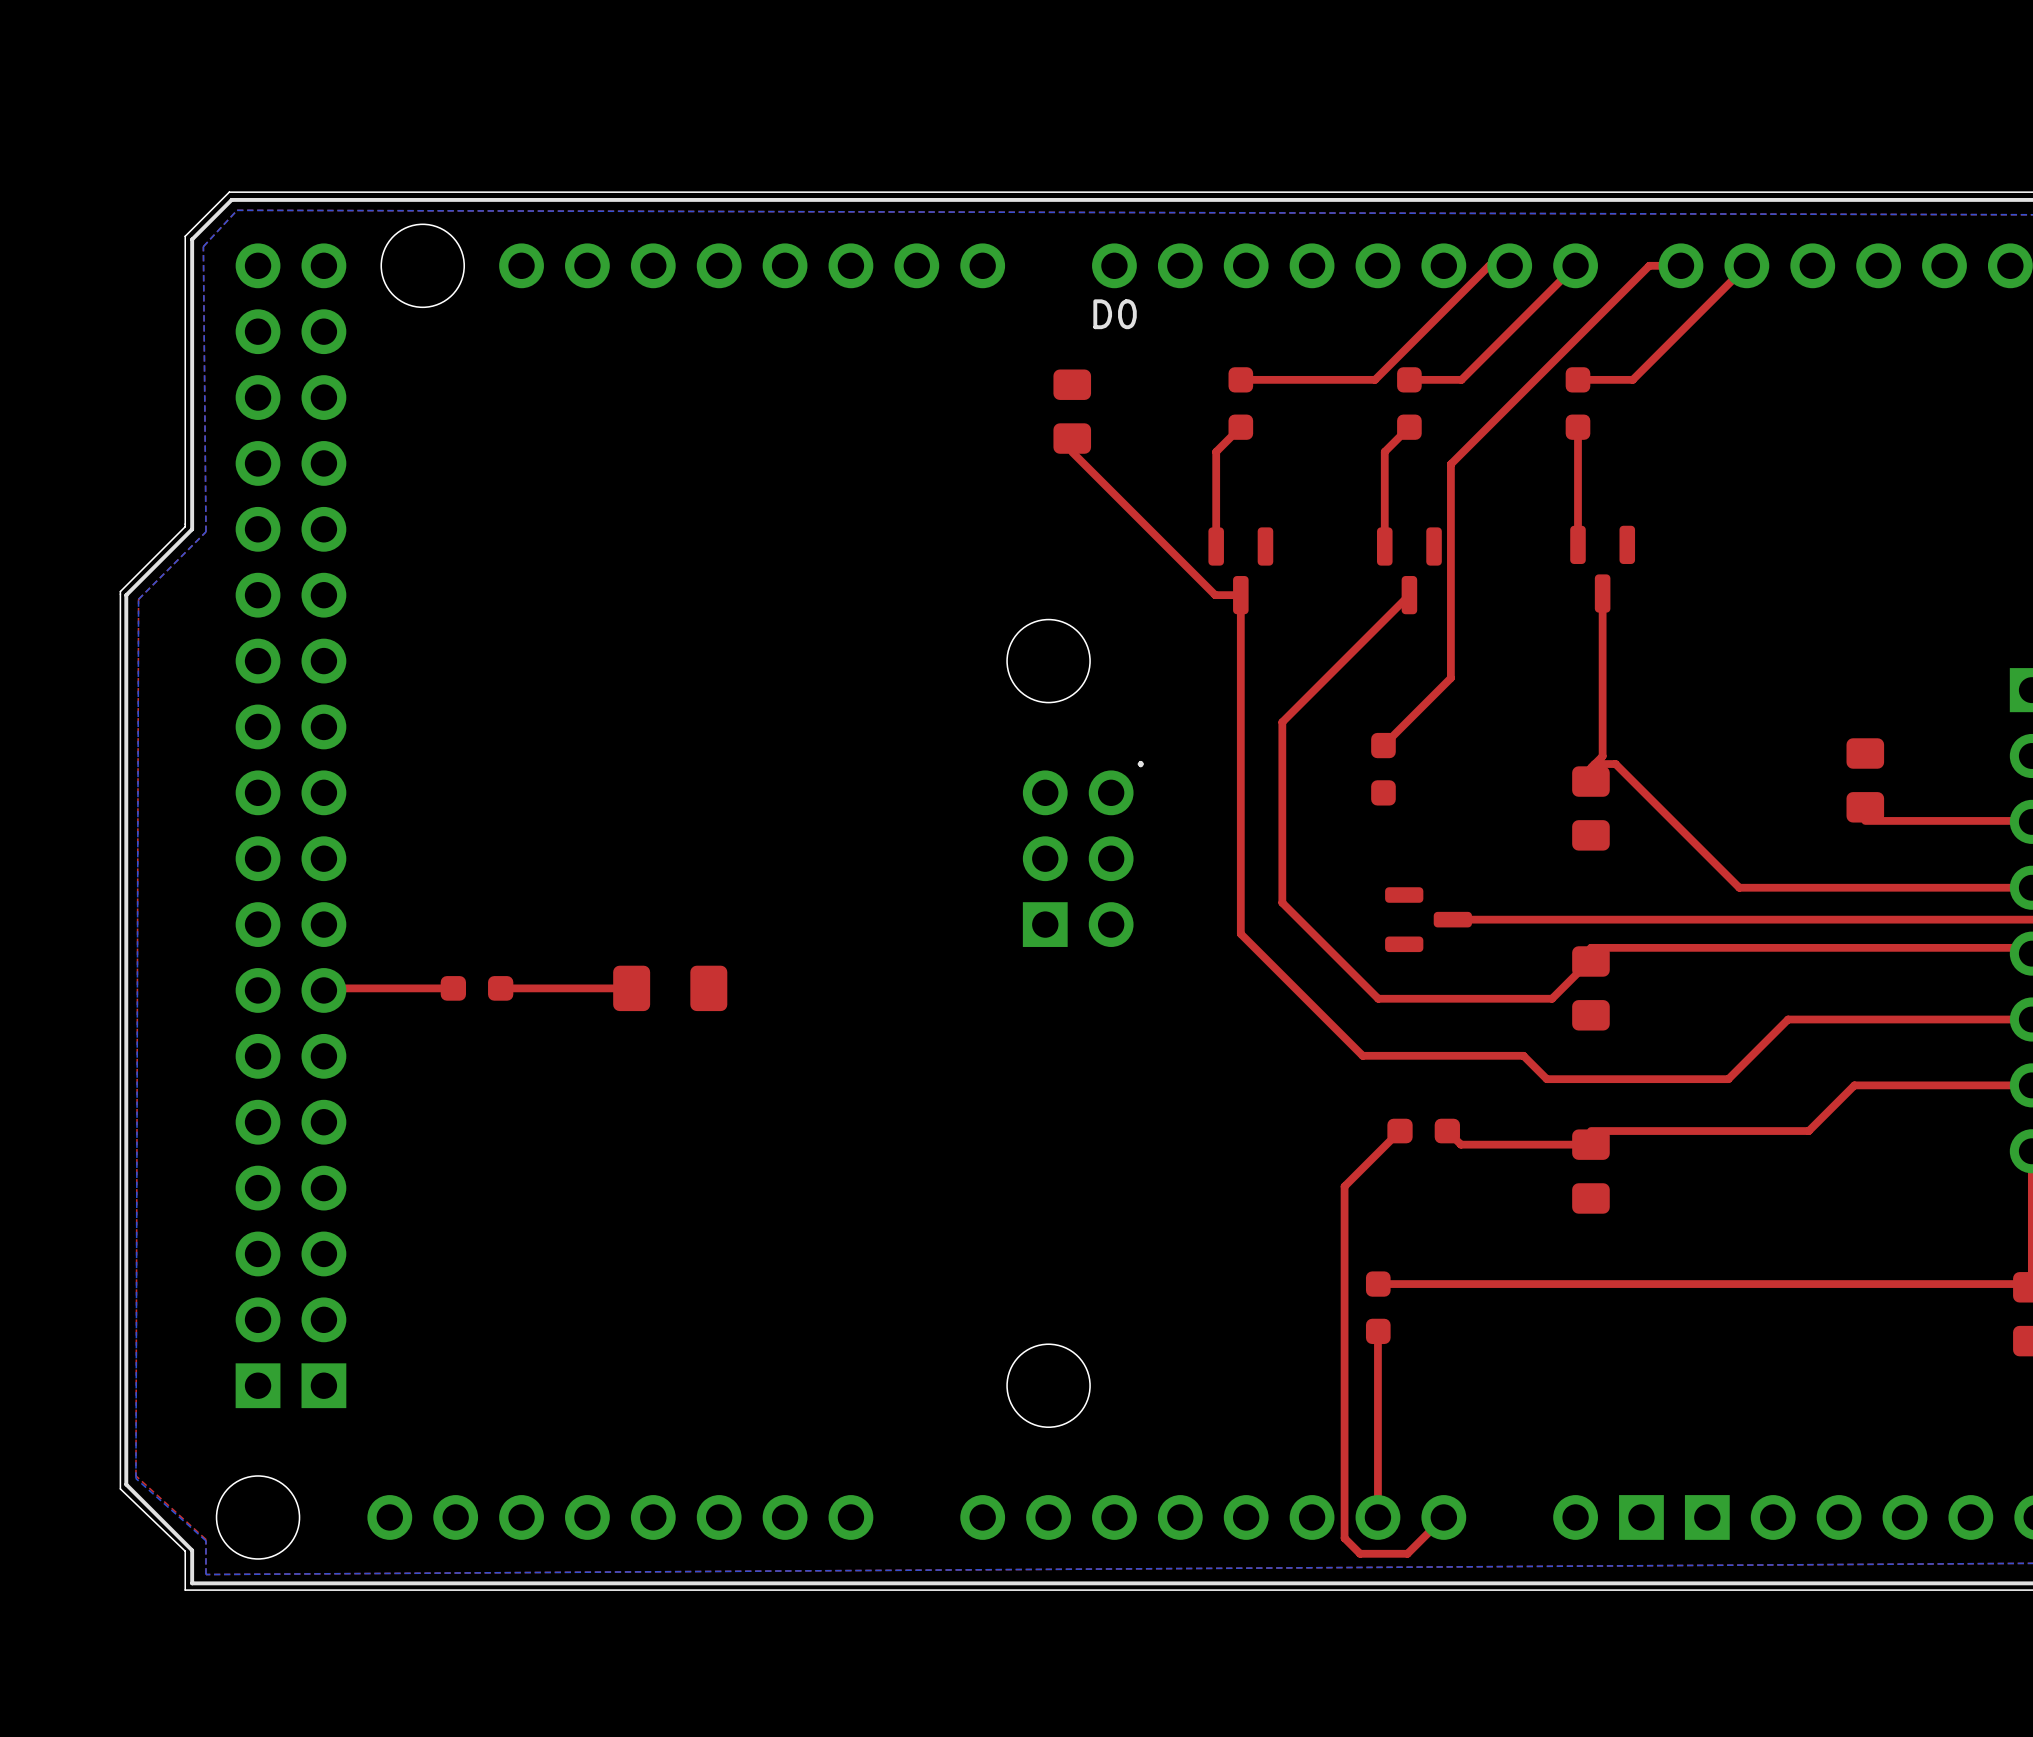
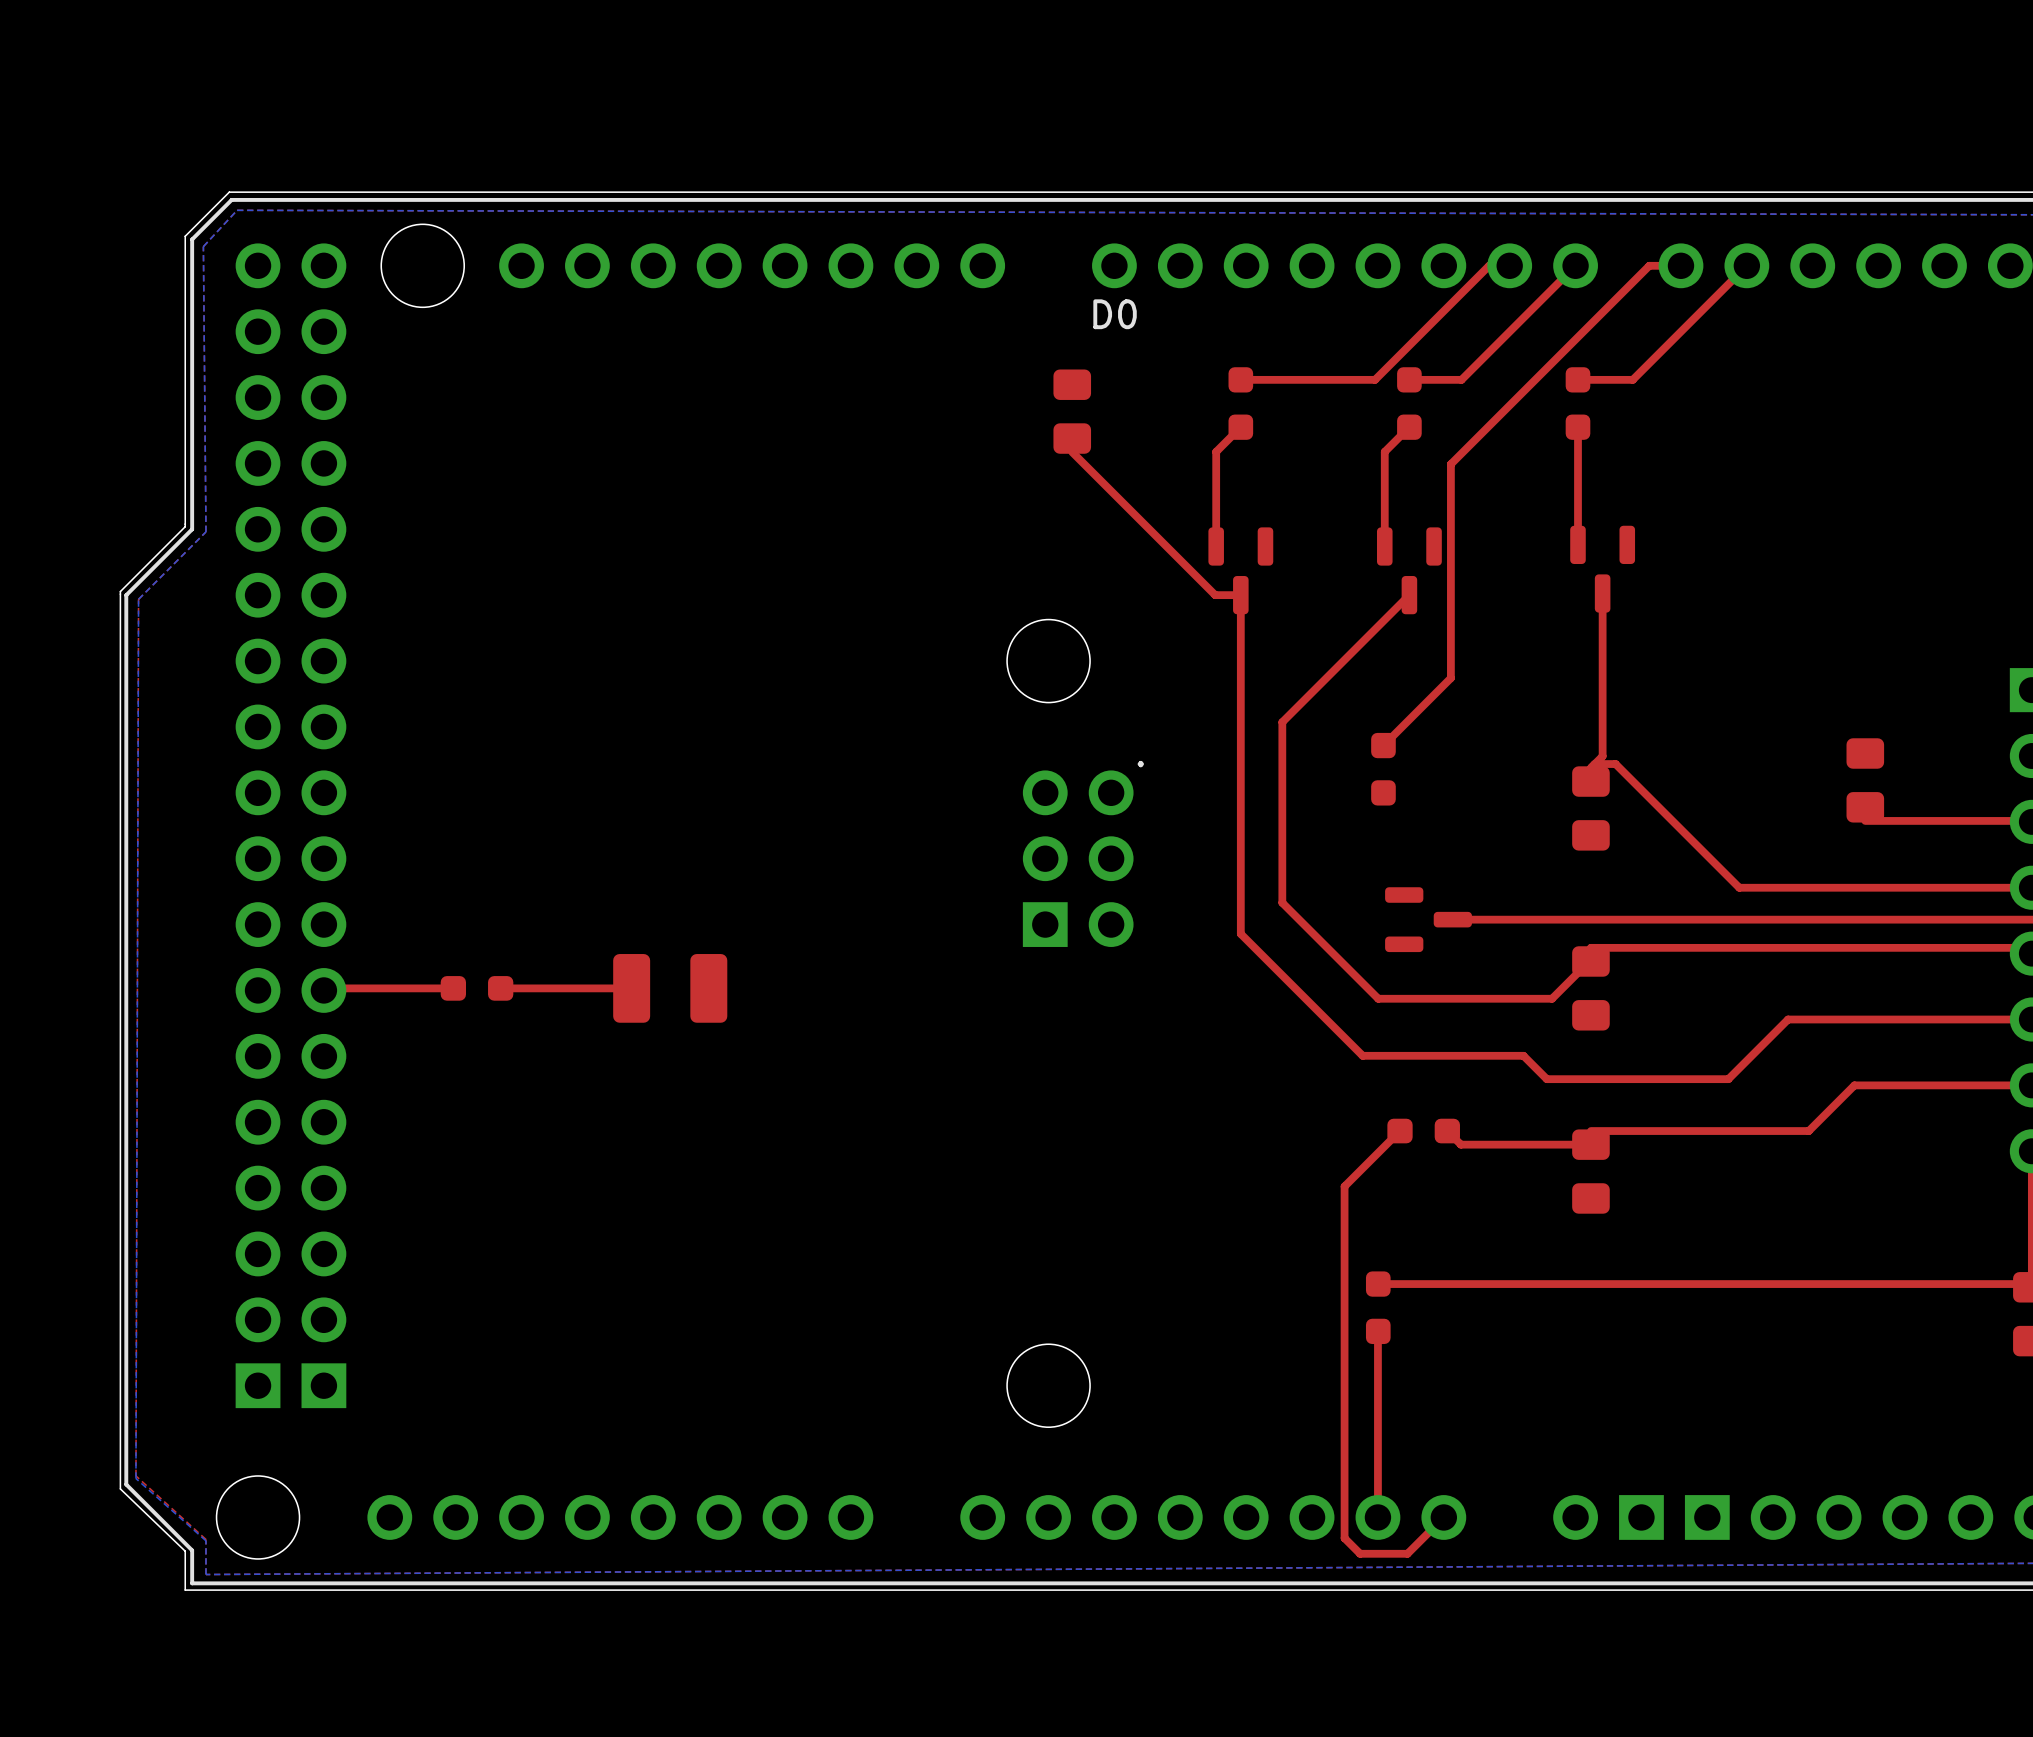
part footprint: [613, 965, 728, 1012] -> [613, 954, 728, 1023]

